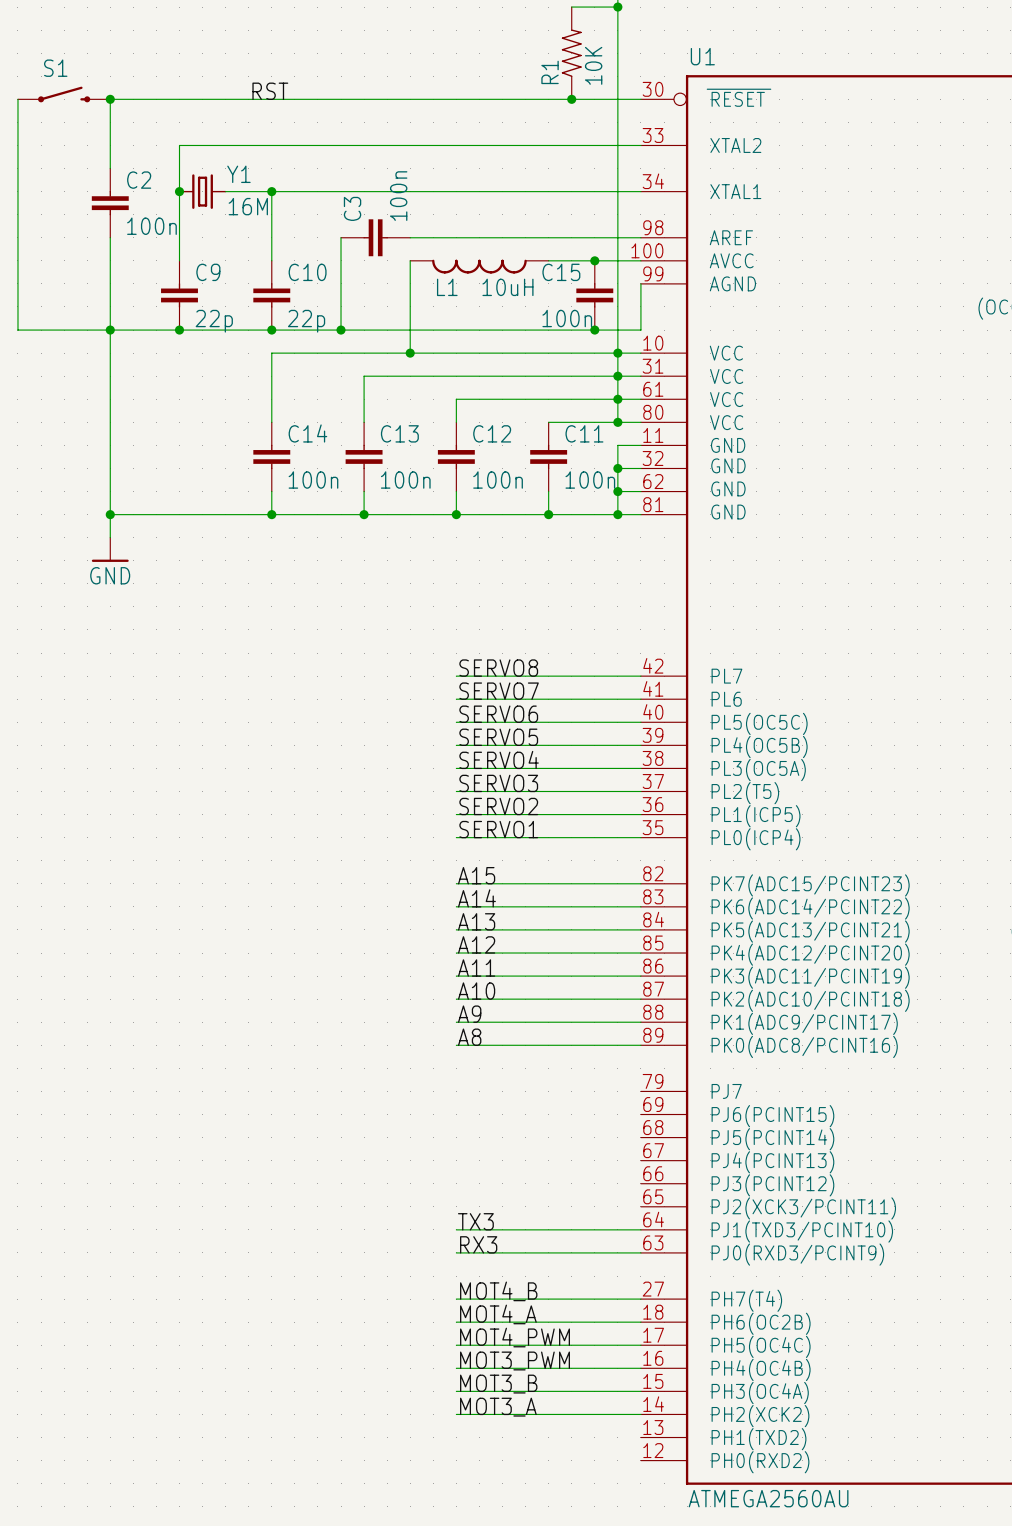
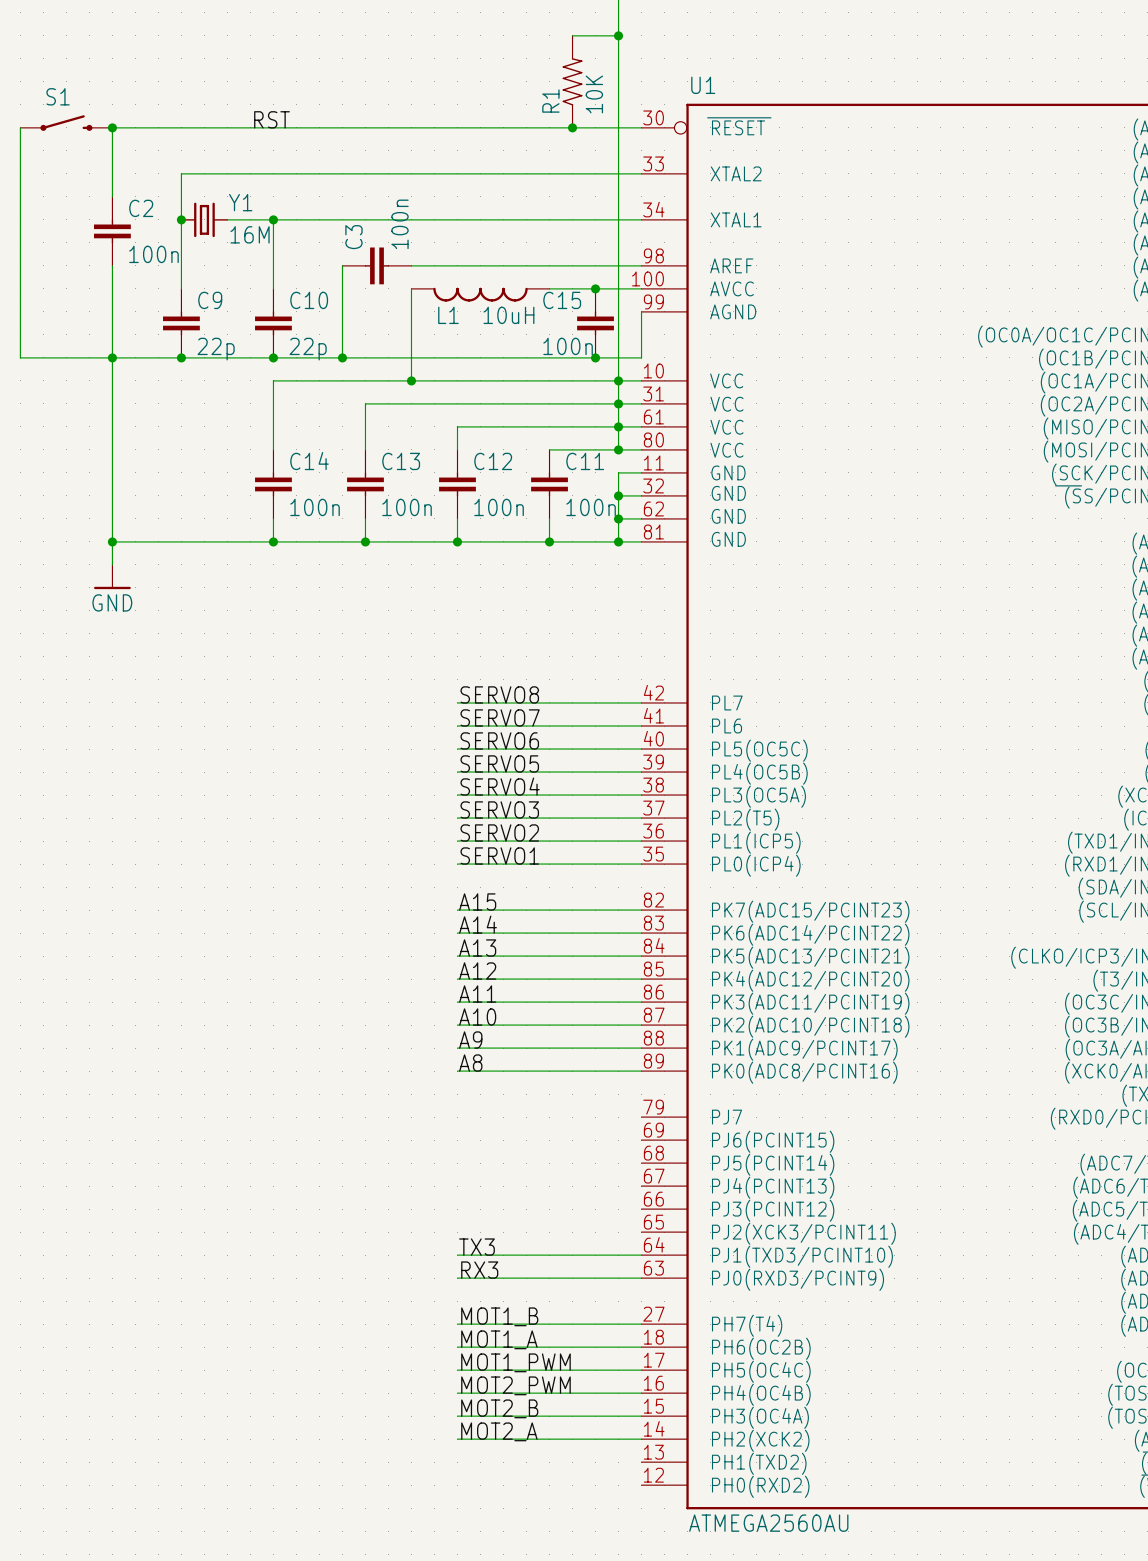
label: MOT4_B (498, 1291) -> MOT1_B (499, 1316)
label: MOT4_A (498, 1314) -> MOT1_A (499, 1339)
label: MOT4_PWM (515, 1337) -> MOT1_PWM (515, 1362)
label: MOT3_PWM (515, 1360) -> MOT2_PWM (515, 1385)
label: MOT3_B (498, 1384) -> MOT2_B (499, 1408)
label: MOT3_A (498, 1407) -> MOT2_A (499, 1431)

